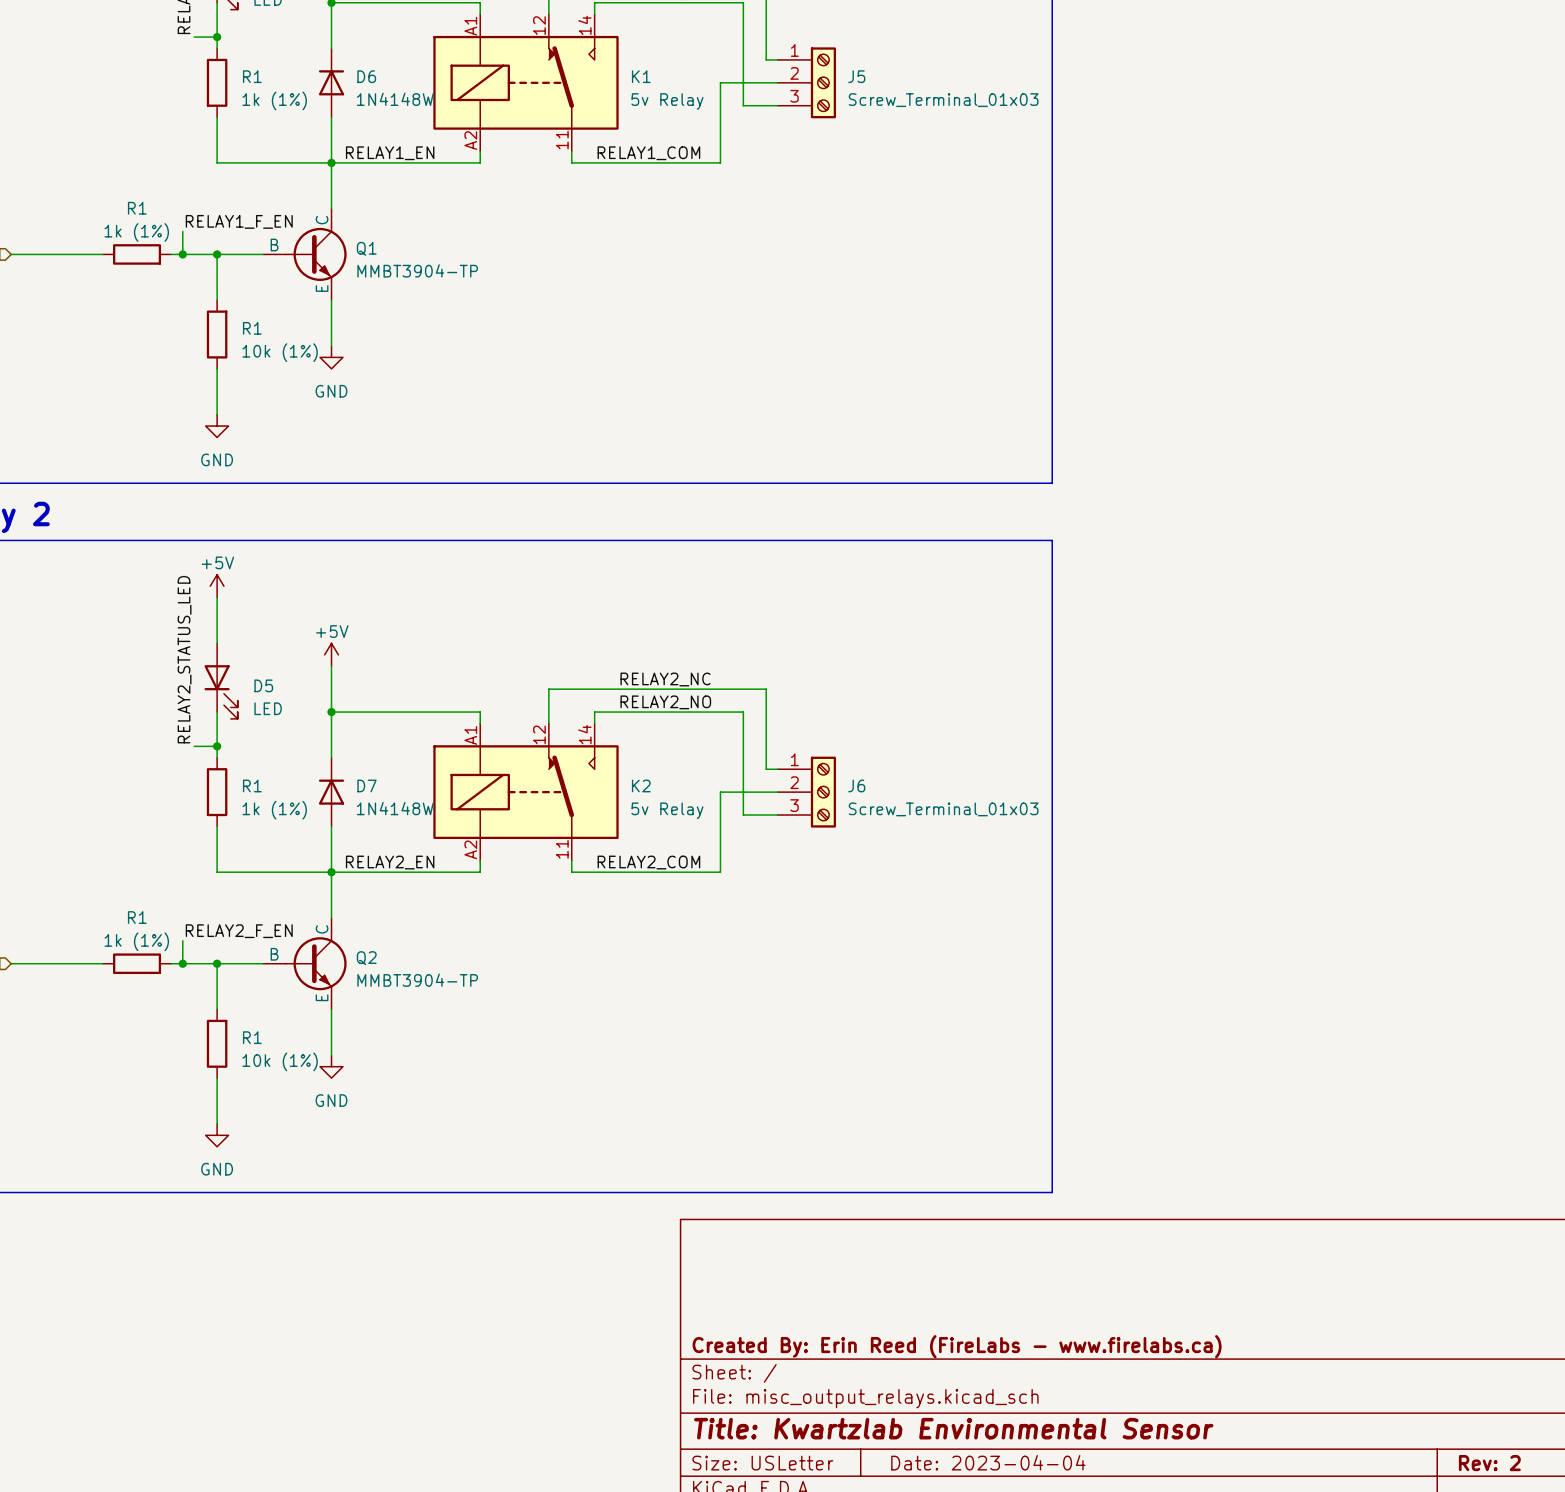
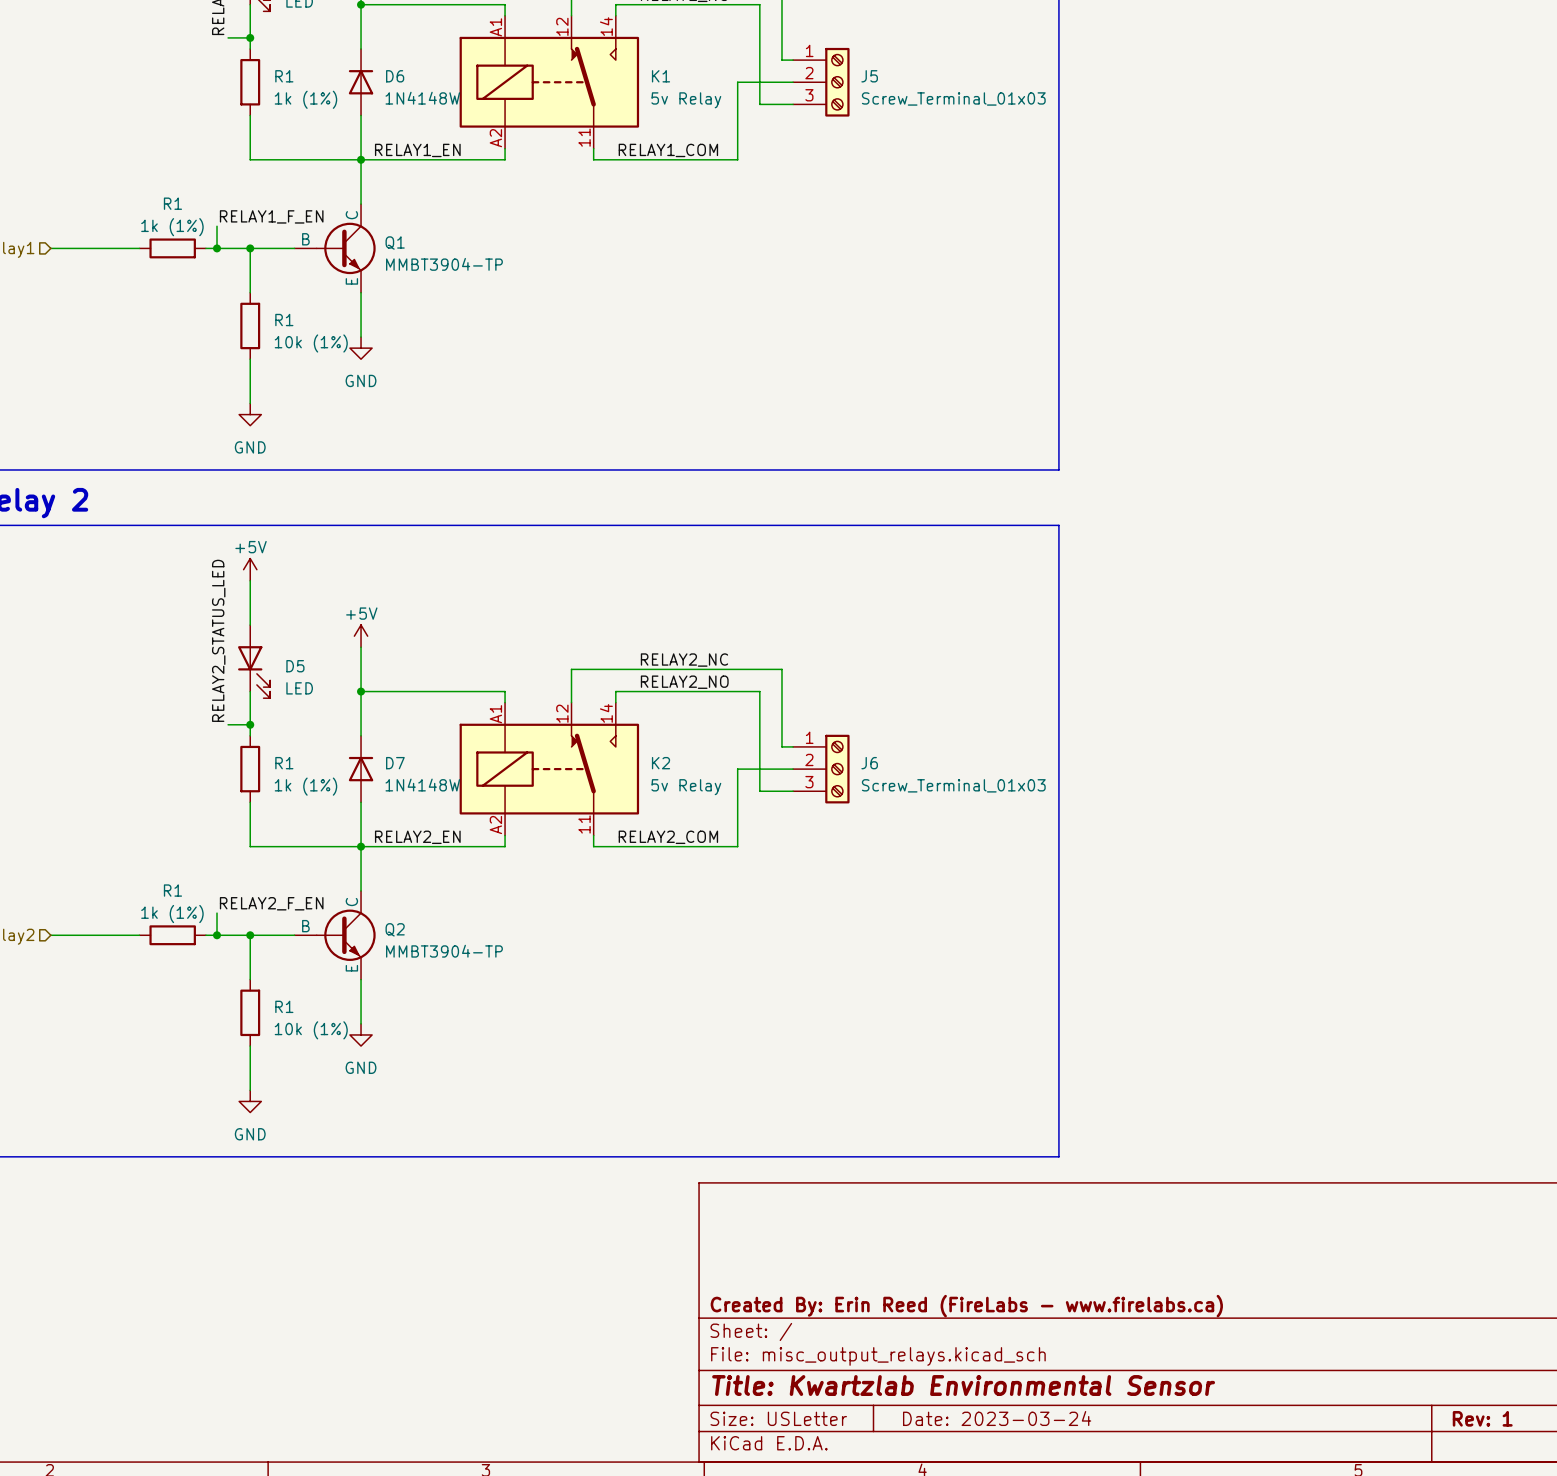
title block: Date: 2023-04-04 (988, 1462) -> Date: 2023-03-24 (997, 1418)
title block: Rev: 2 (1489, 1463) -> Rev: 1 (1482, 1418)

